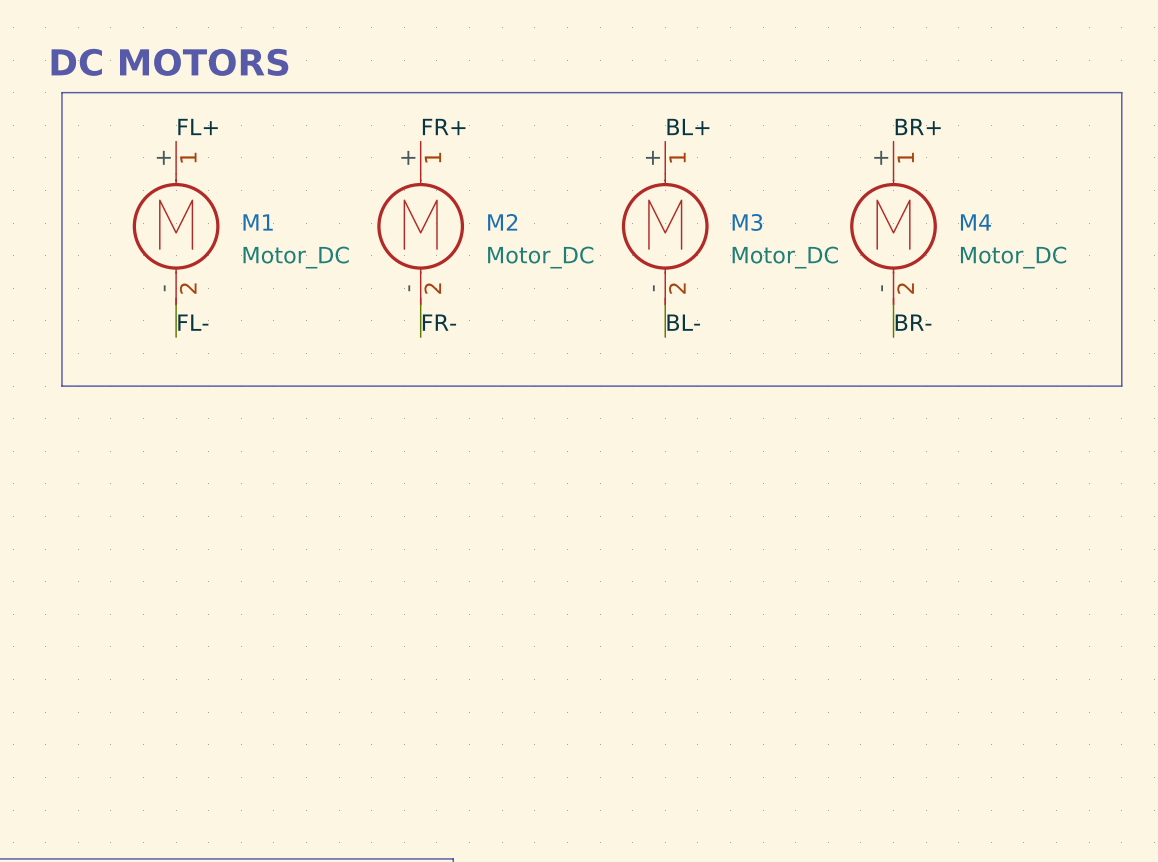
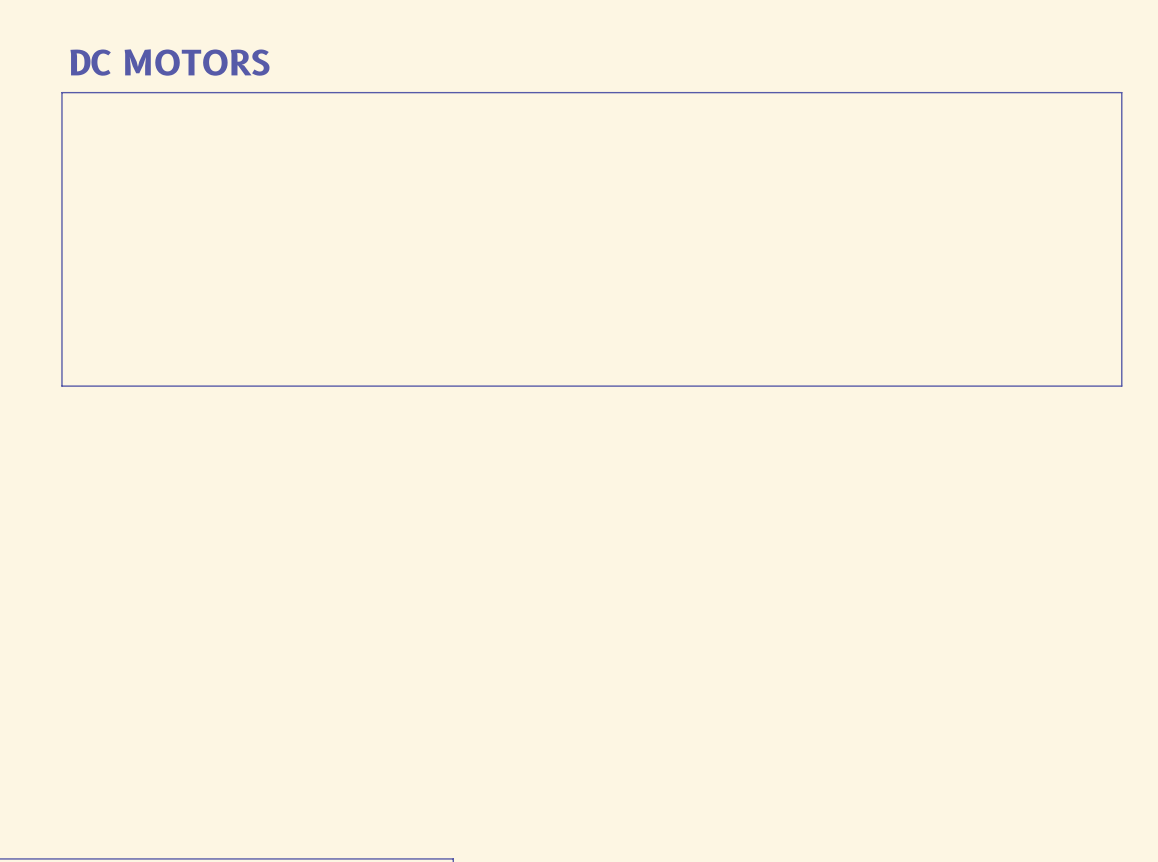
label: FL+ (198, 126) -> none
label: FR+ (444, 126) -> none
label: BL+ (688, 126) -> none
label: BR+ (918, 126) -> none
M1: Motor_DC (176, 223) -> none
M2: Motor_DC (420, 223) -> none
M3: Motor_DC (665, 223) -> none
M4: Motor_DC (893, 223) -> none
wire: (176, 304) (176, 337) -> none
wire: (420, 304) (420, 337) -> none
wire: (665, 304) (665, 337) -> none
wire: (893, 304) (893, 337) -> none
label: FL- (193, 322) -> none
label: FR- (439, 322) -> none
label: BL- (683, 322) -> none
label: BR- (913, 322) -> none

